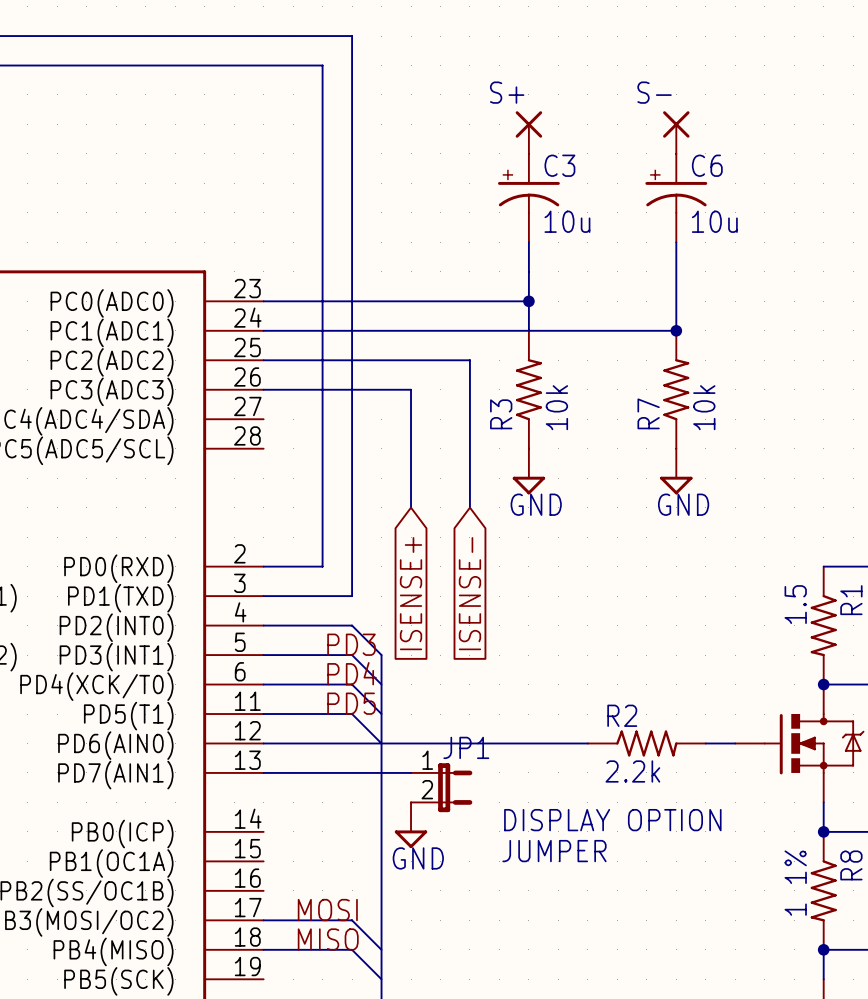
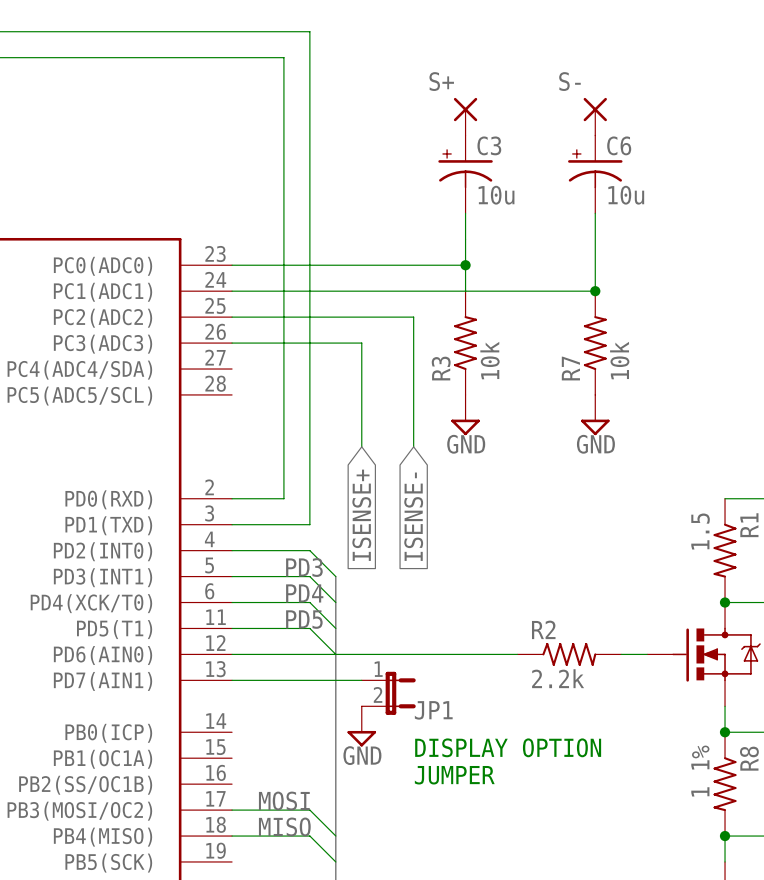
JP1 name position: JP1 (466, 747) -> JP1 (433, 710)
text position: DISPLAY OPTION (612, 820) -> DISPLAY OPTION (508, 747)
text position: JUMPER (554, 851) -> JUMPER (454, 775)

